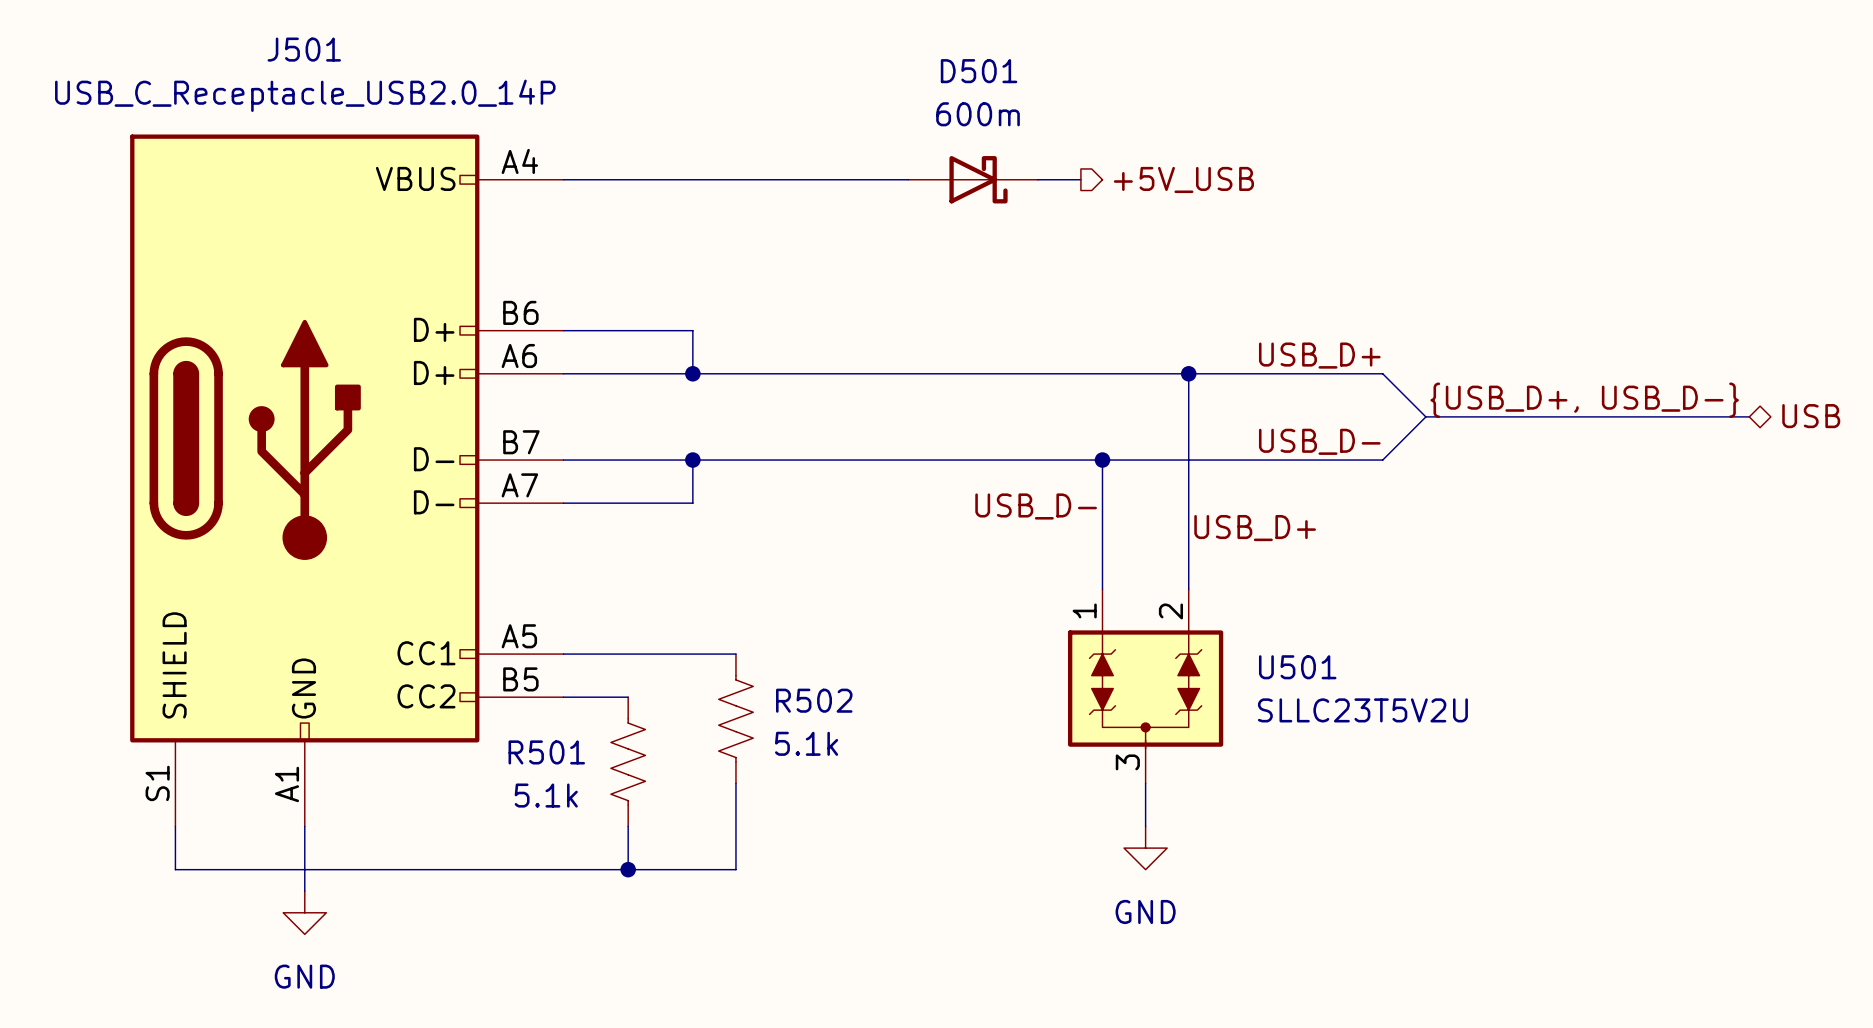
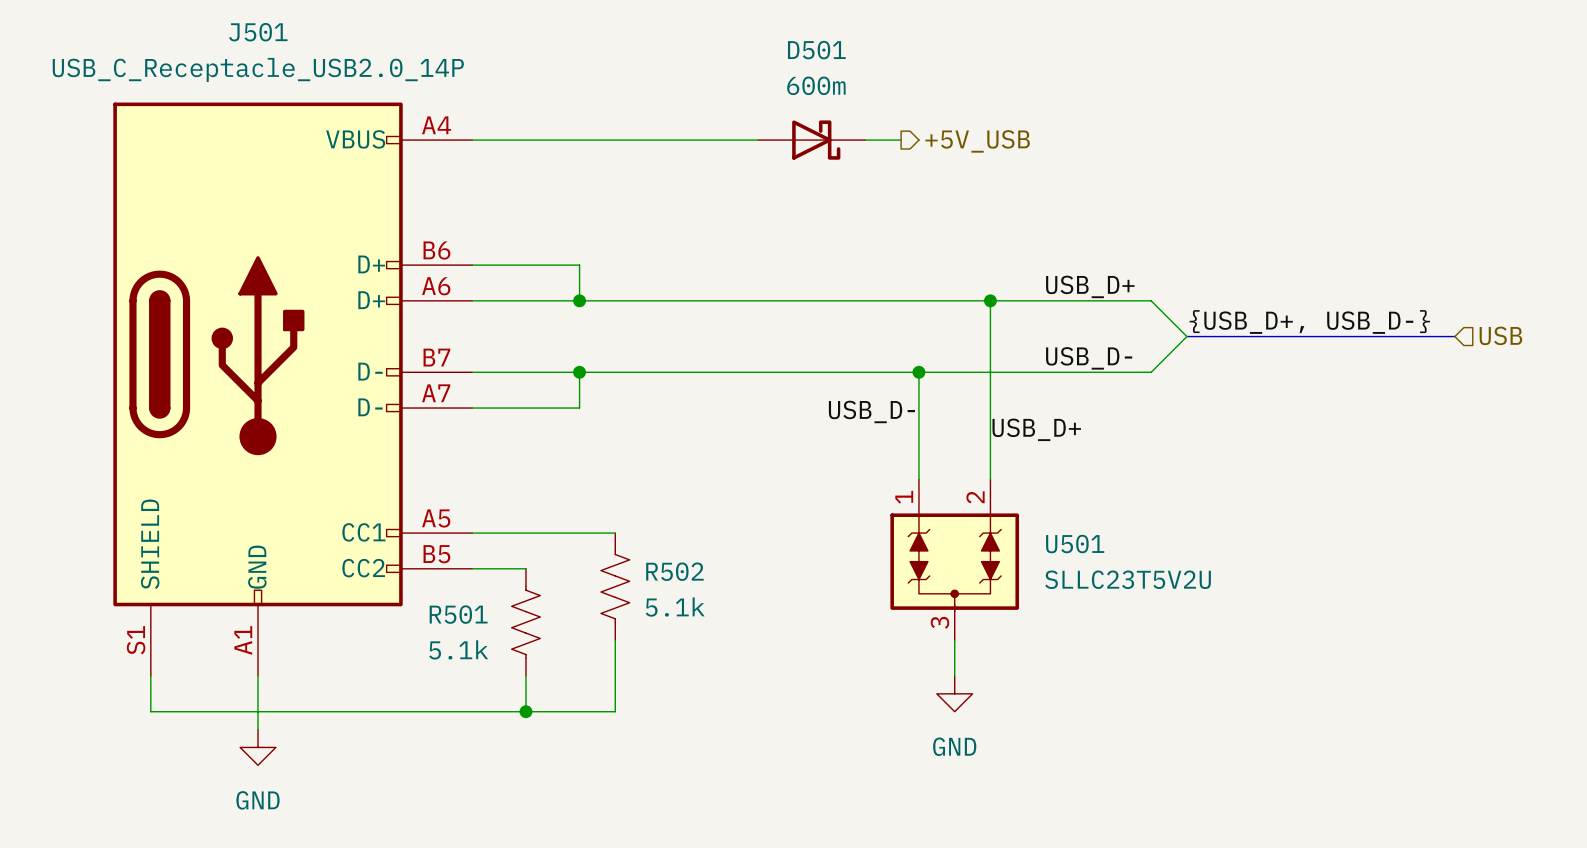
hierarchical label shape: bidirectional (1811, 416) -> input (1500, 335)

